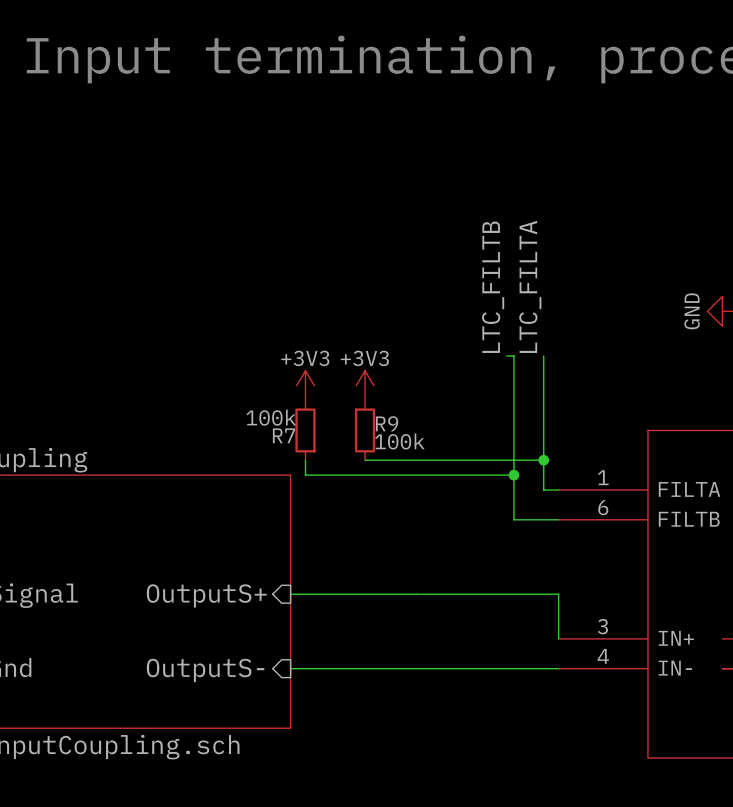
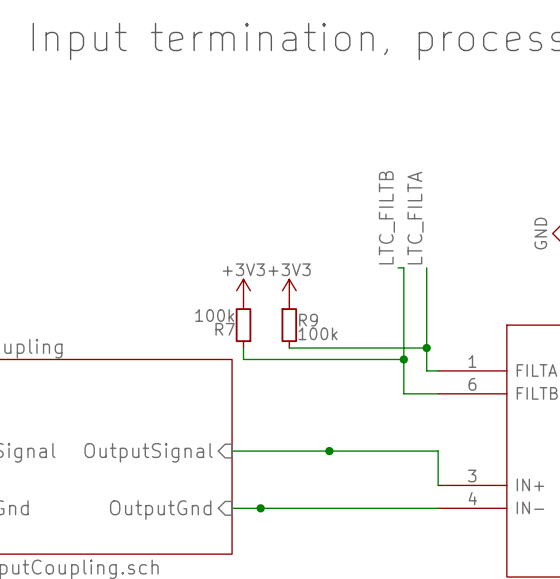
junction: none -> (329, 451)
sheet pin: OutputS+ (206, 595) -> OutputSignal (148, 452)
junction: none -> (260, 508)
sheet pin: OutputS- (205, 670) -> OutputGnd (160, 510)

